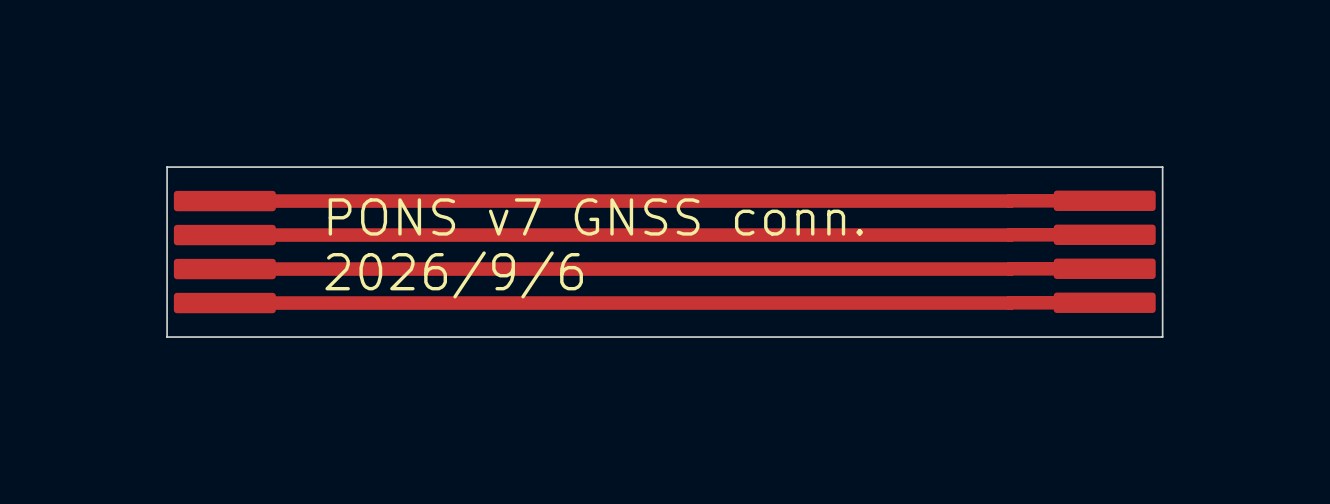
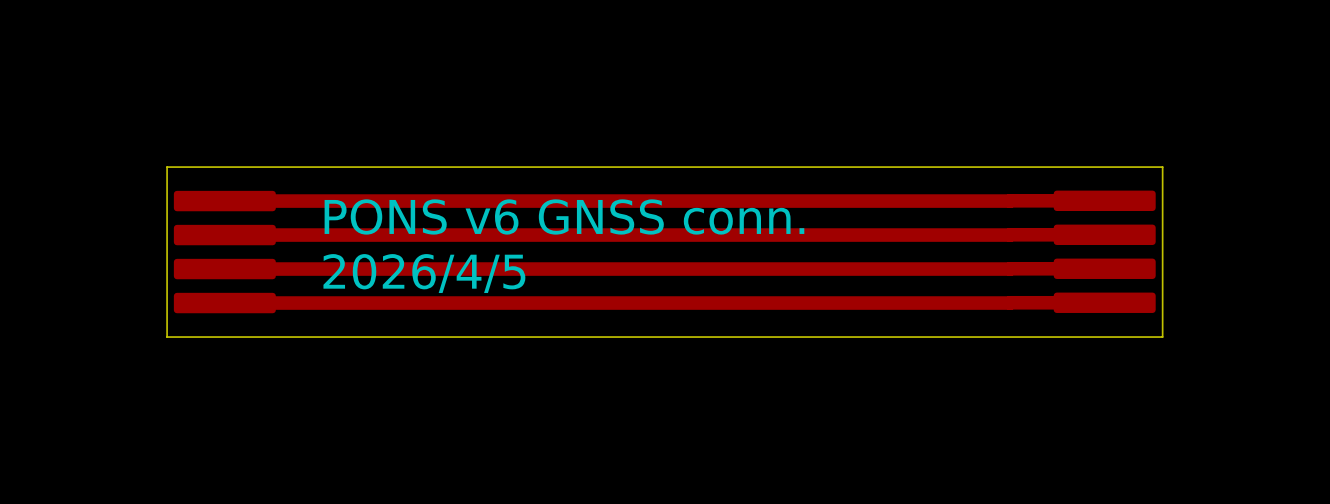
text: PONS v7 GNSS conn. (595, 216) -> PONS v6 GNSS conn. (564, 216)
text: 2026/9/6 (454, 274) -> 2026/4/5 (424, 273)

